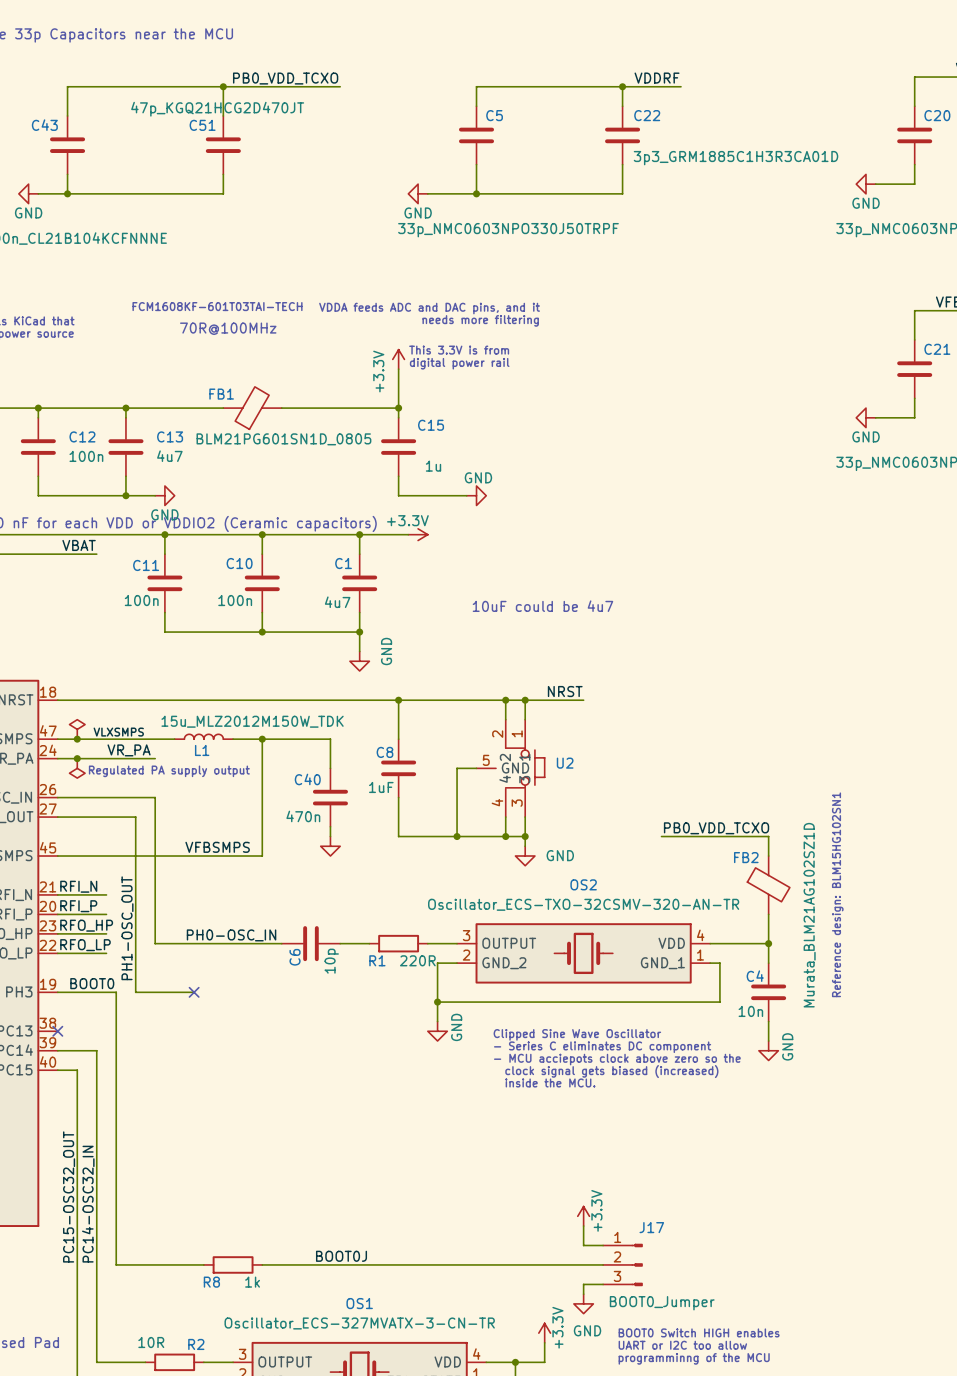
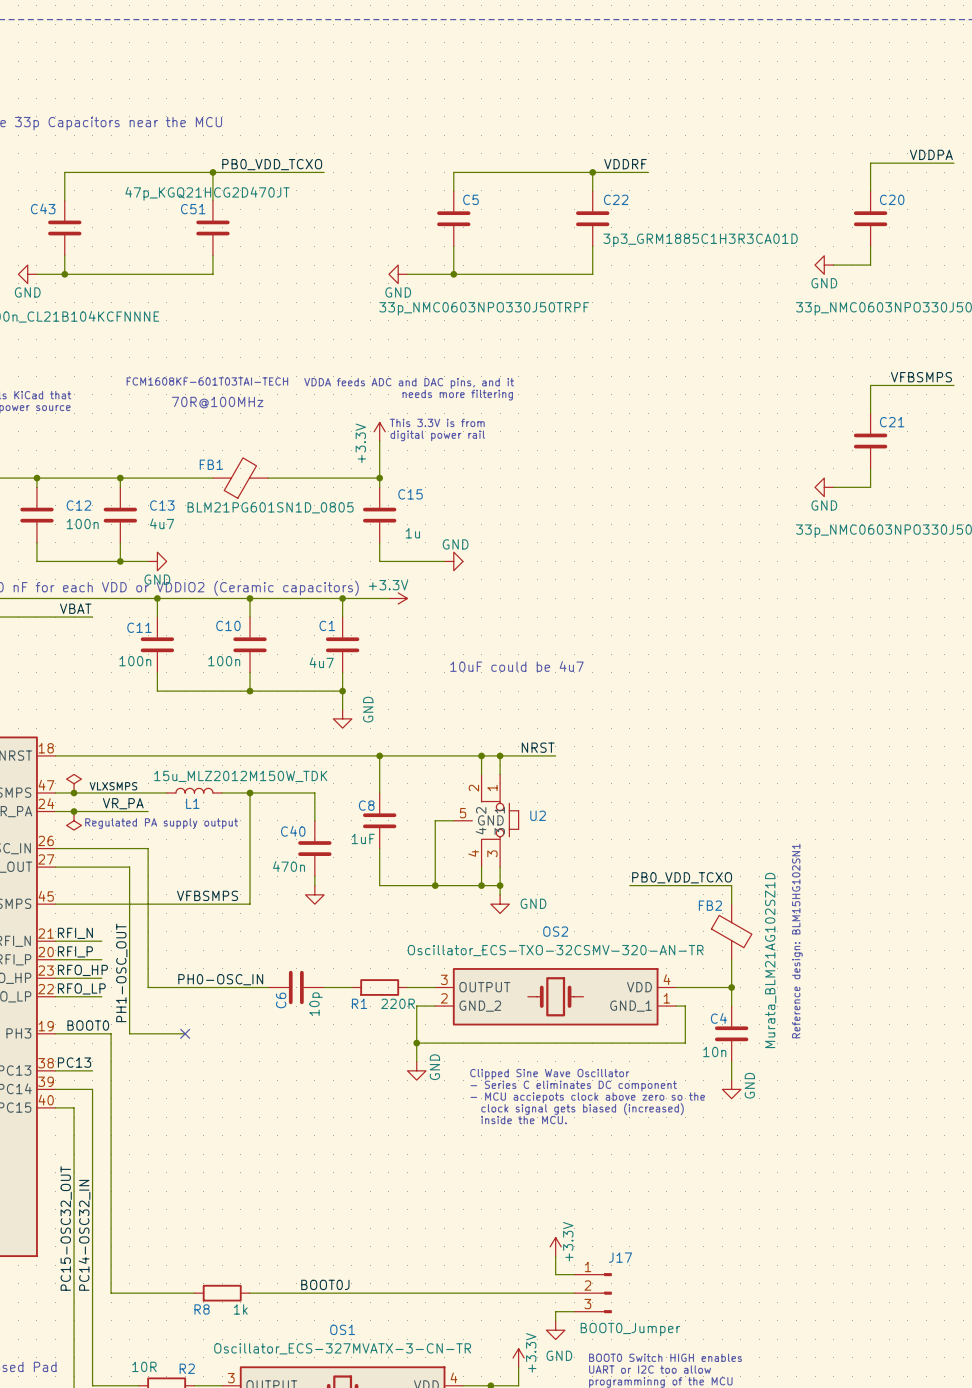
label: none -> PC13 (74, 1062)
wire: none -> (55, 1070) (92, 1070)
no-connect mark: (57, 1031) -> none

